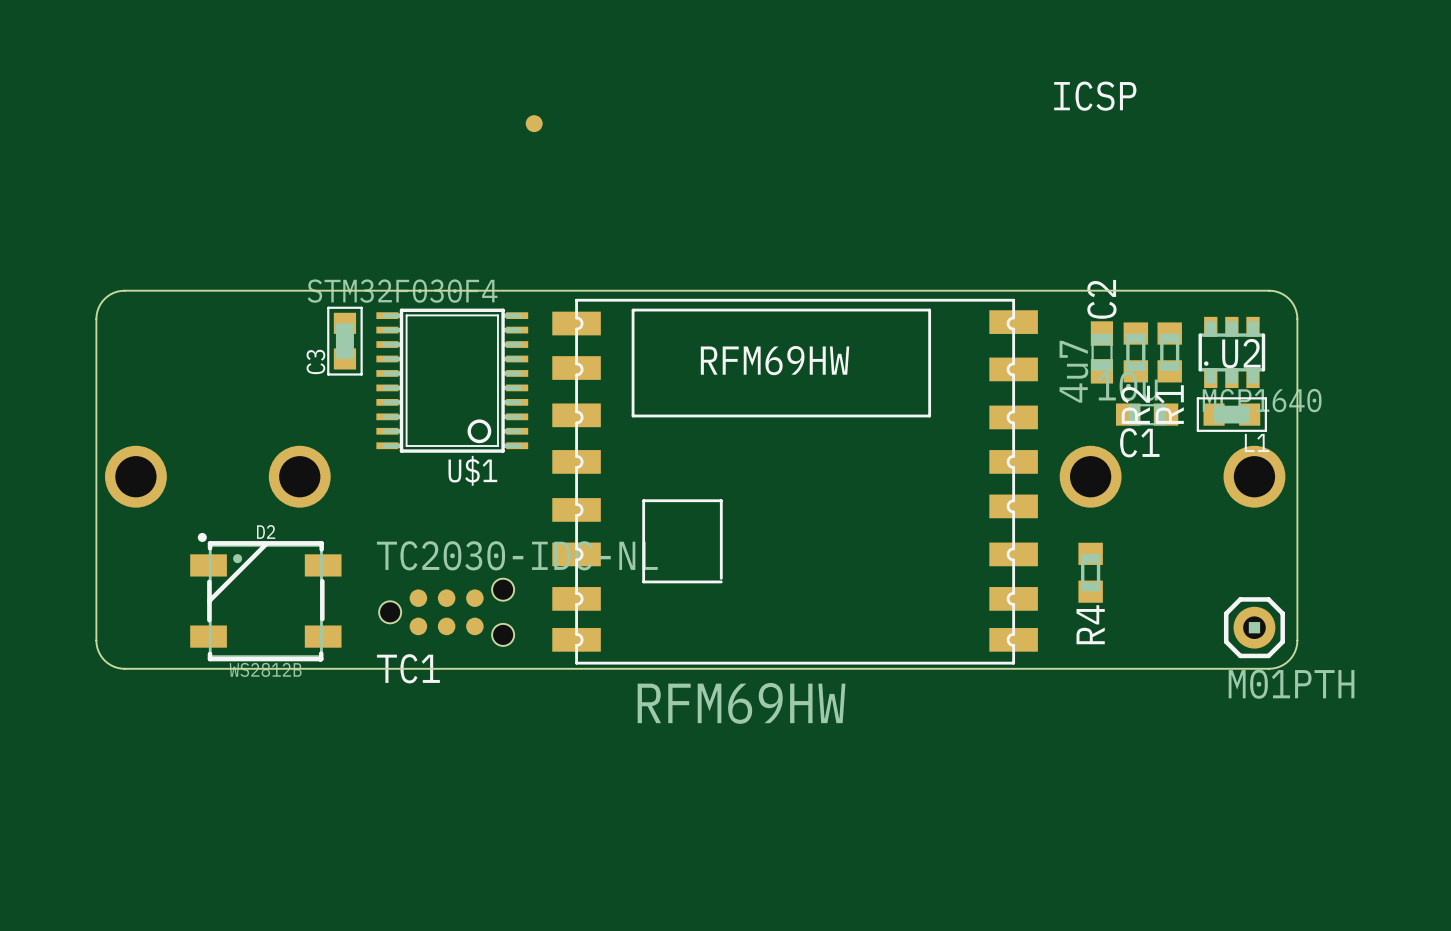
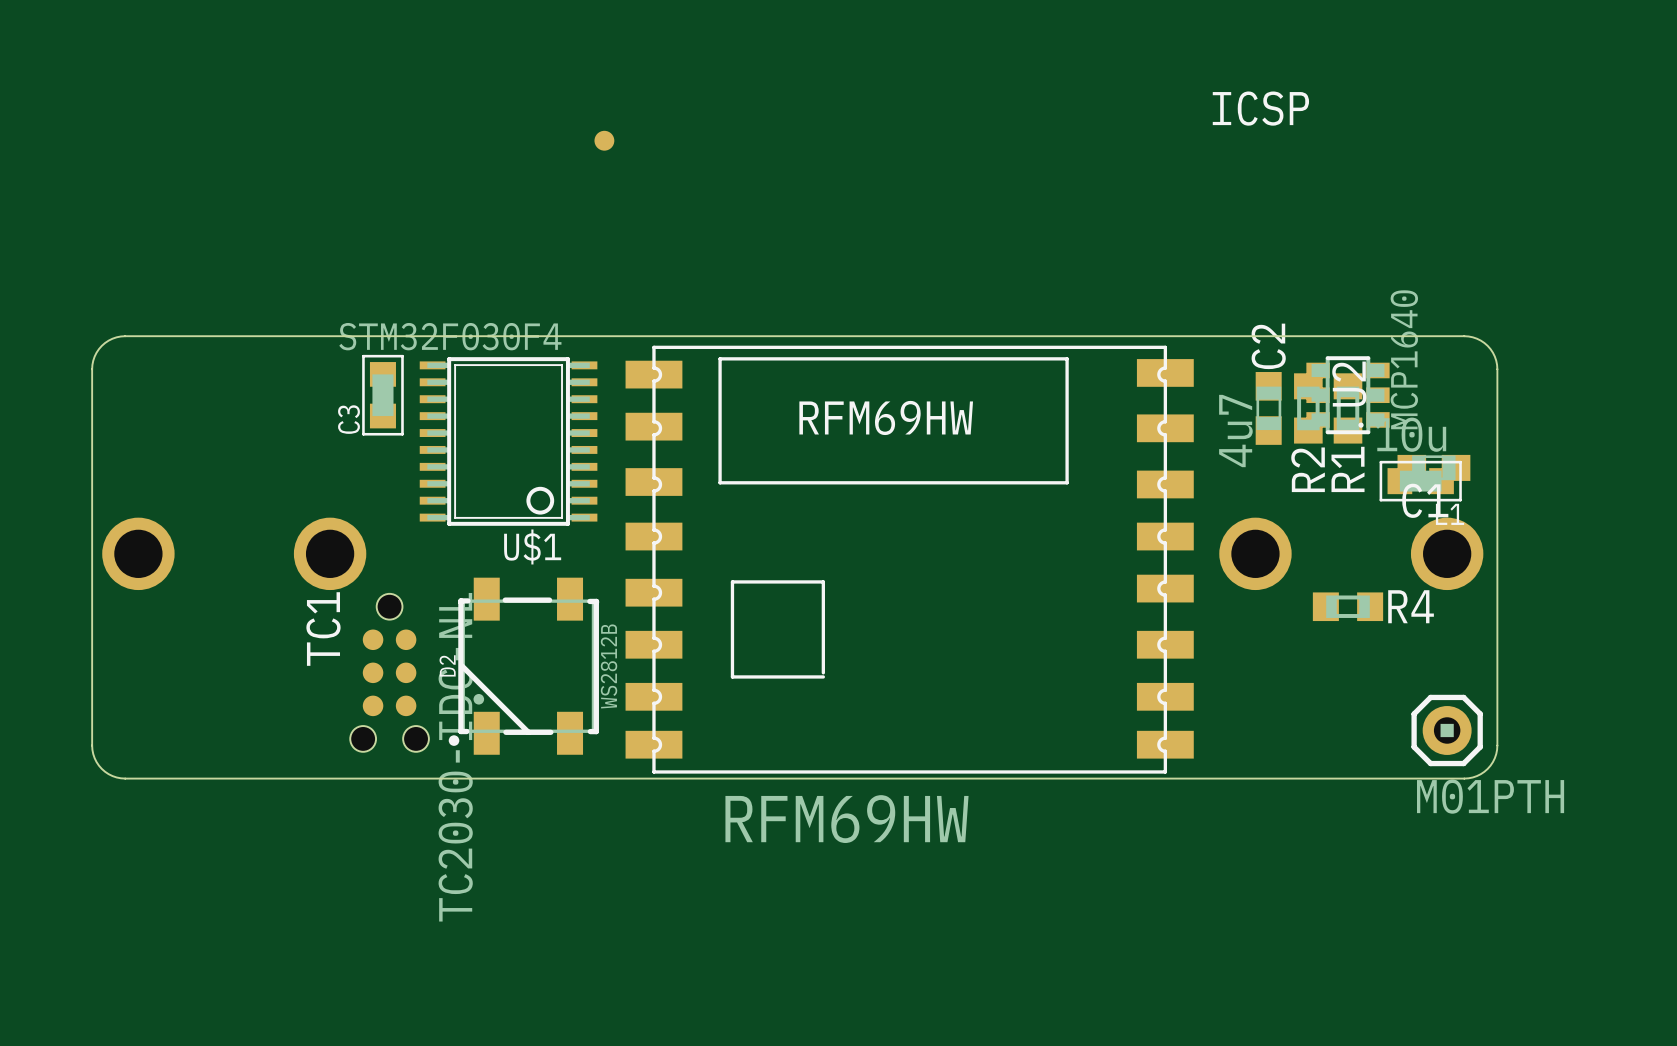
U2 rotation: 0° (1231, 352) -> 90° counterclockwise (1348, 395)
U2 position: (1231, 352) -> (1348, 395)
C1 position: (1147, 414) -> (1433, 467)
R4 rotation: 0° (1090, 572) -> 90° clockwise (1348, 606)
R4 position: (1090, 572) -> (1348, 606)
D2 rotation: 0° (265, 597) -> 90° counterclockwise (523, 666)
D2 position: (265, 597) -> (523, 666)
TC1 rotation: 0° (446, 612) -> 90° clockwise (389, 672)
TC1 position: (446, 612) -> (389, 672)
R4 name position: R4 (1090, 624) -> R4 (1411, 606)

